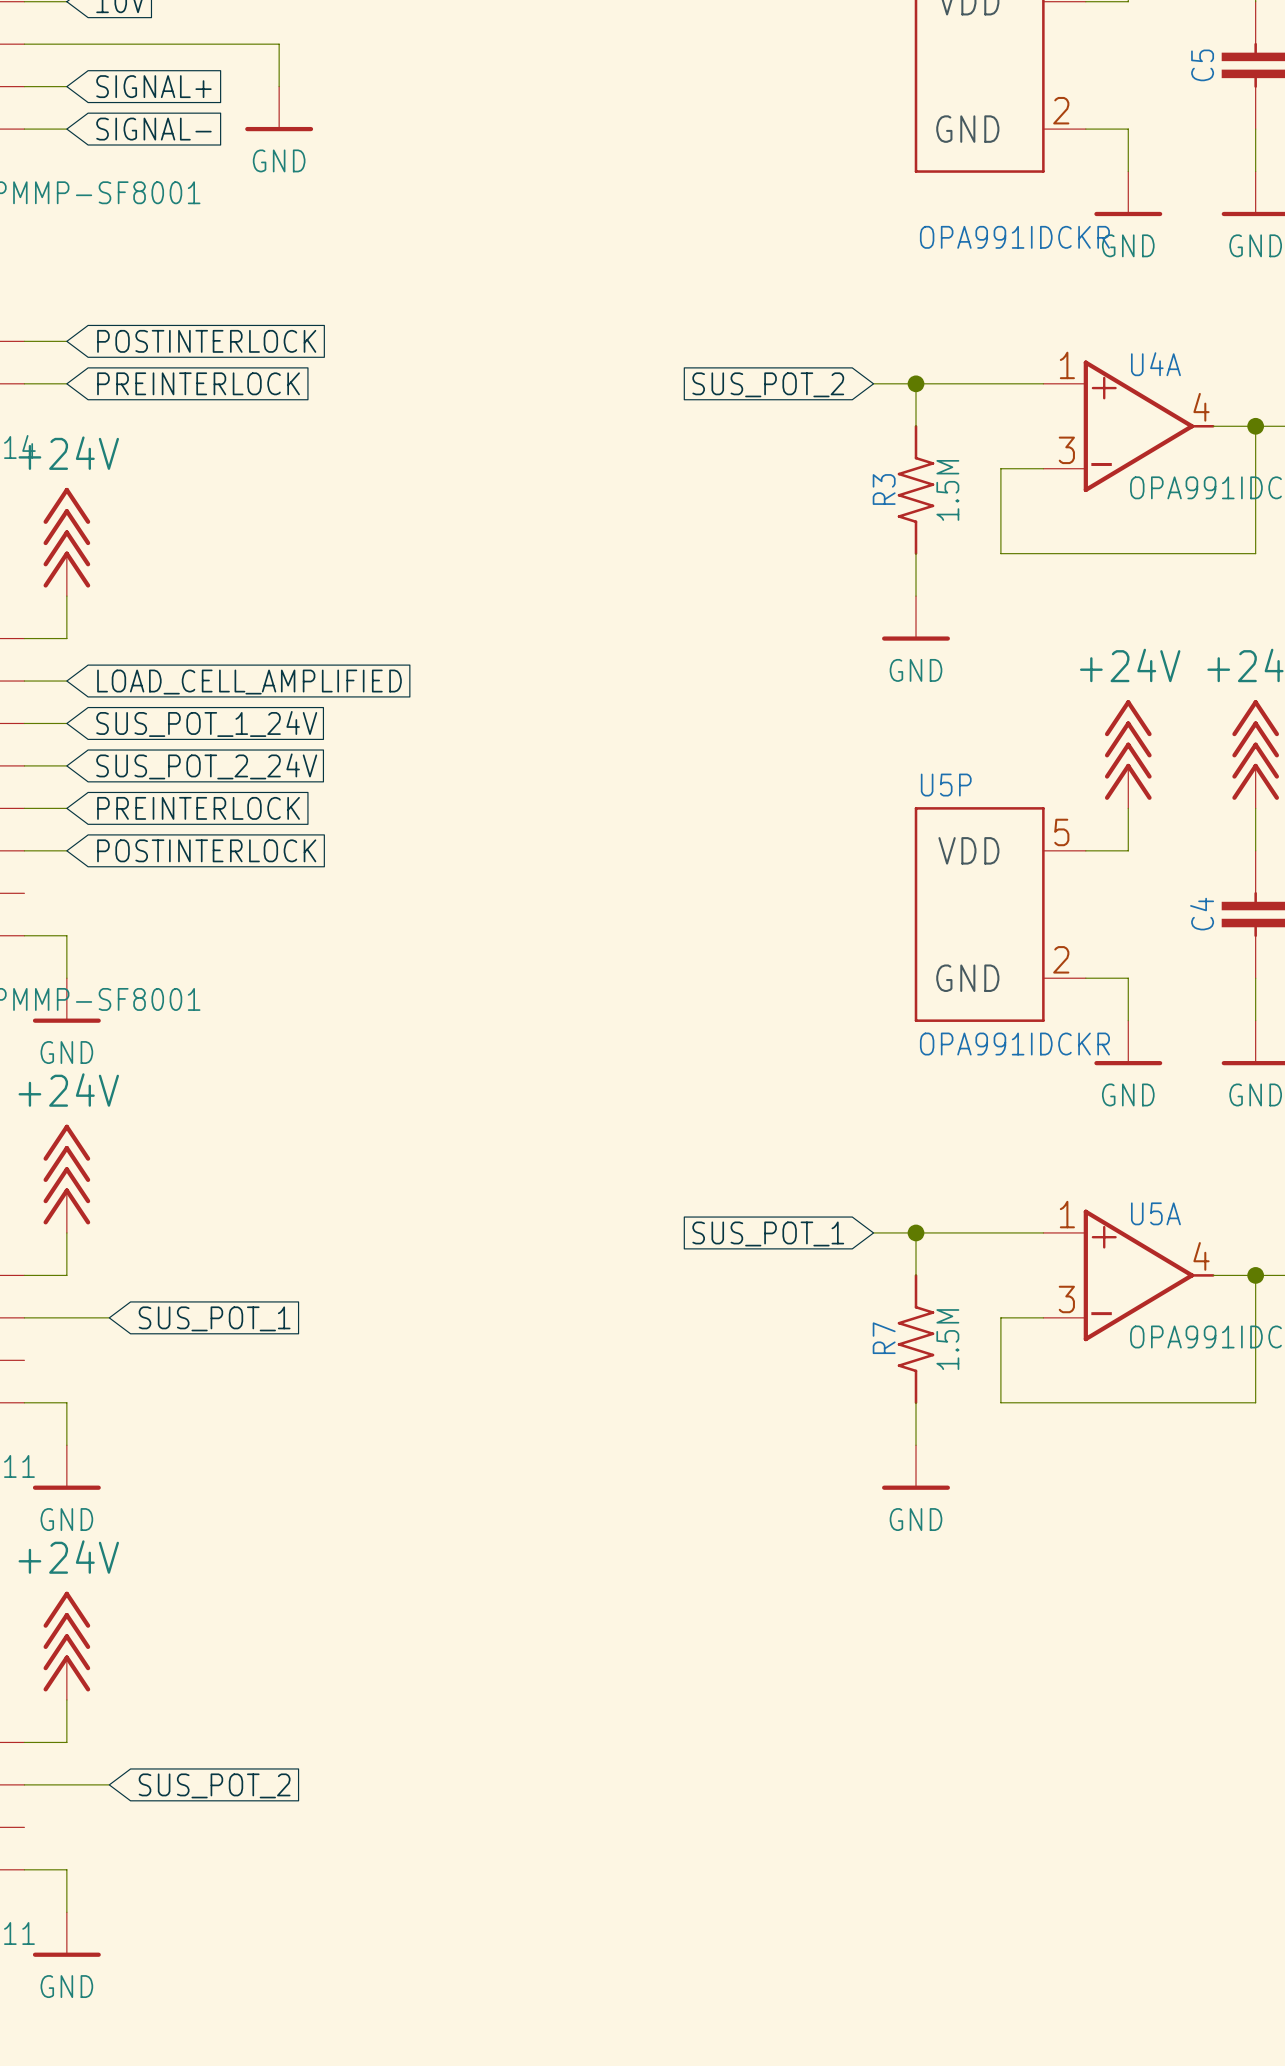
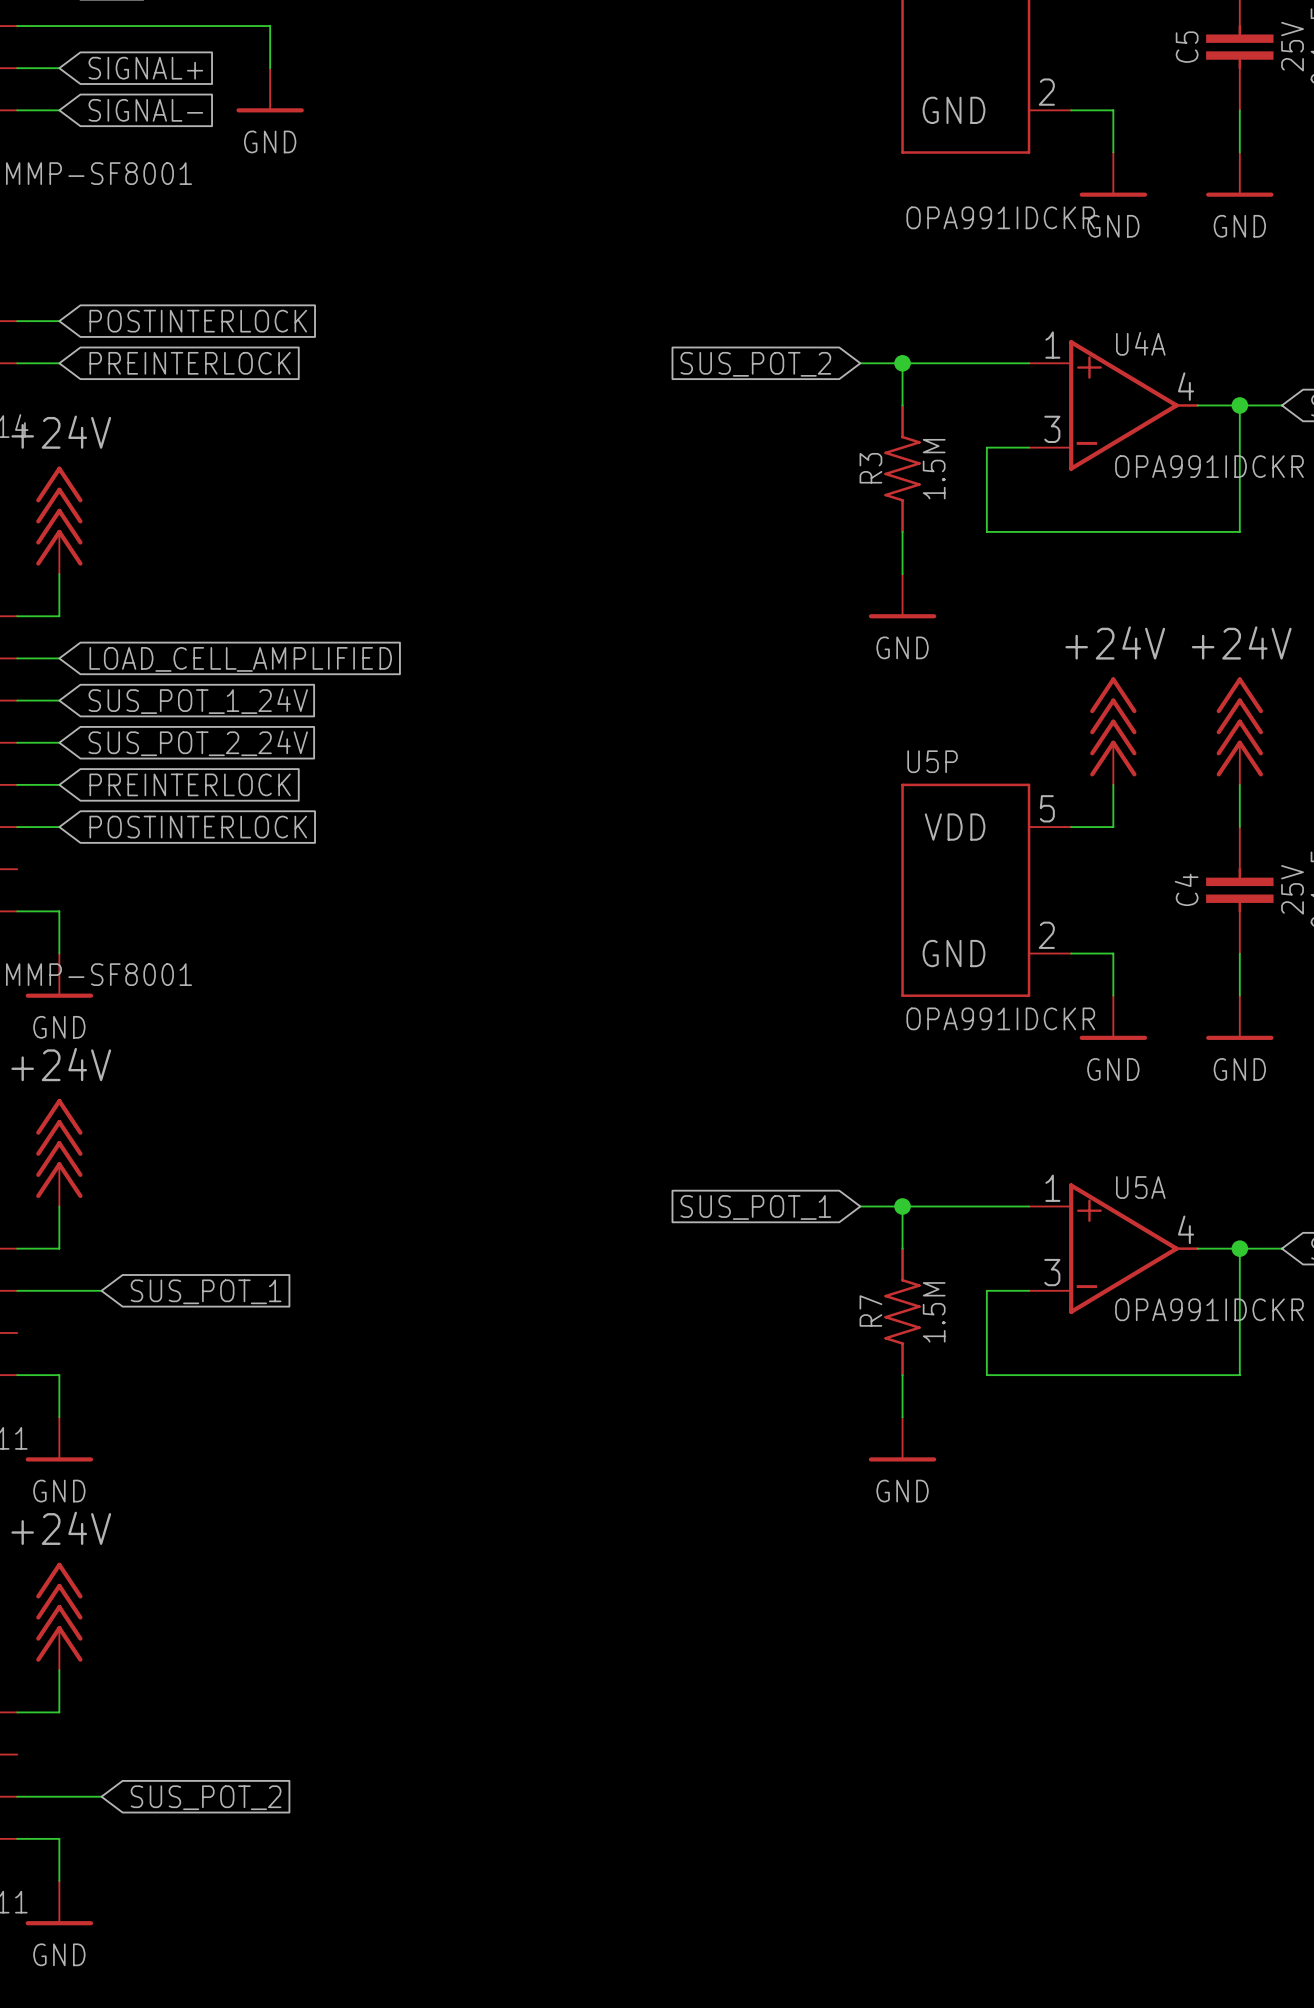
wire: (24, 1784) (109, 1784) -> (17, 1796) (101, 1796)
global label position: SUS_POT_2 (214, 1785) -> SUS_POT_2 (206, 1797)

